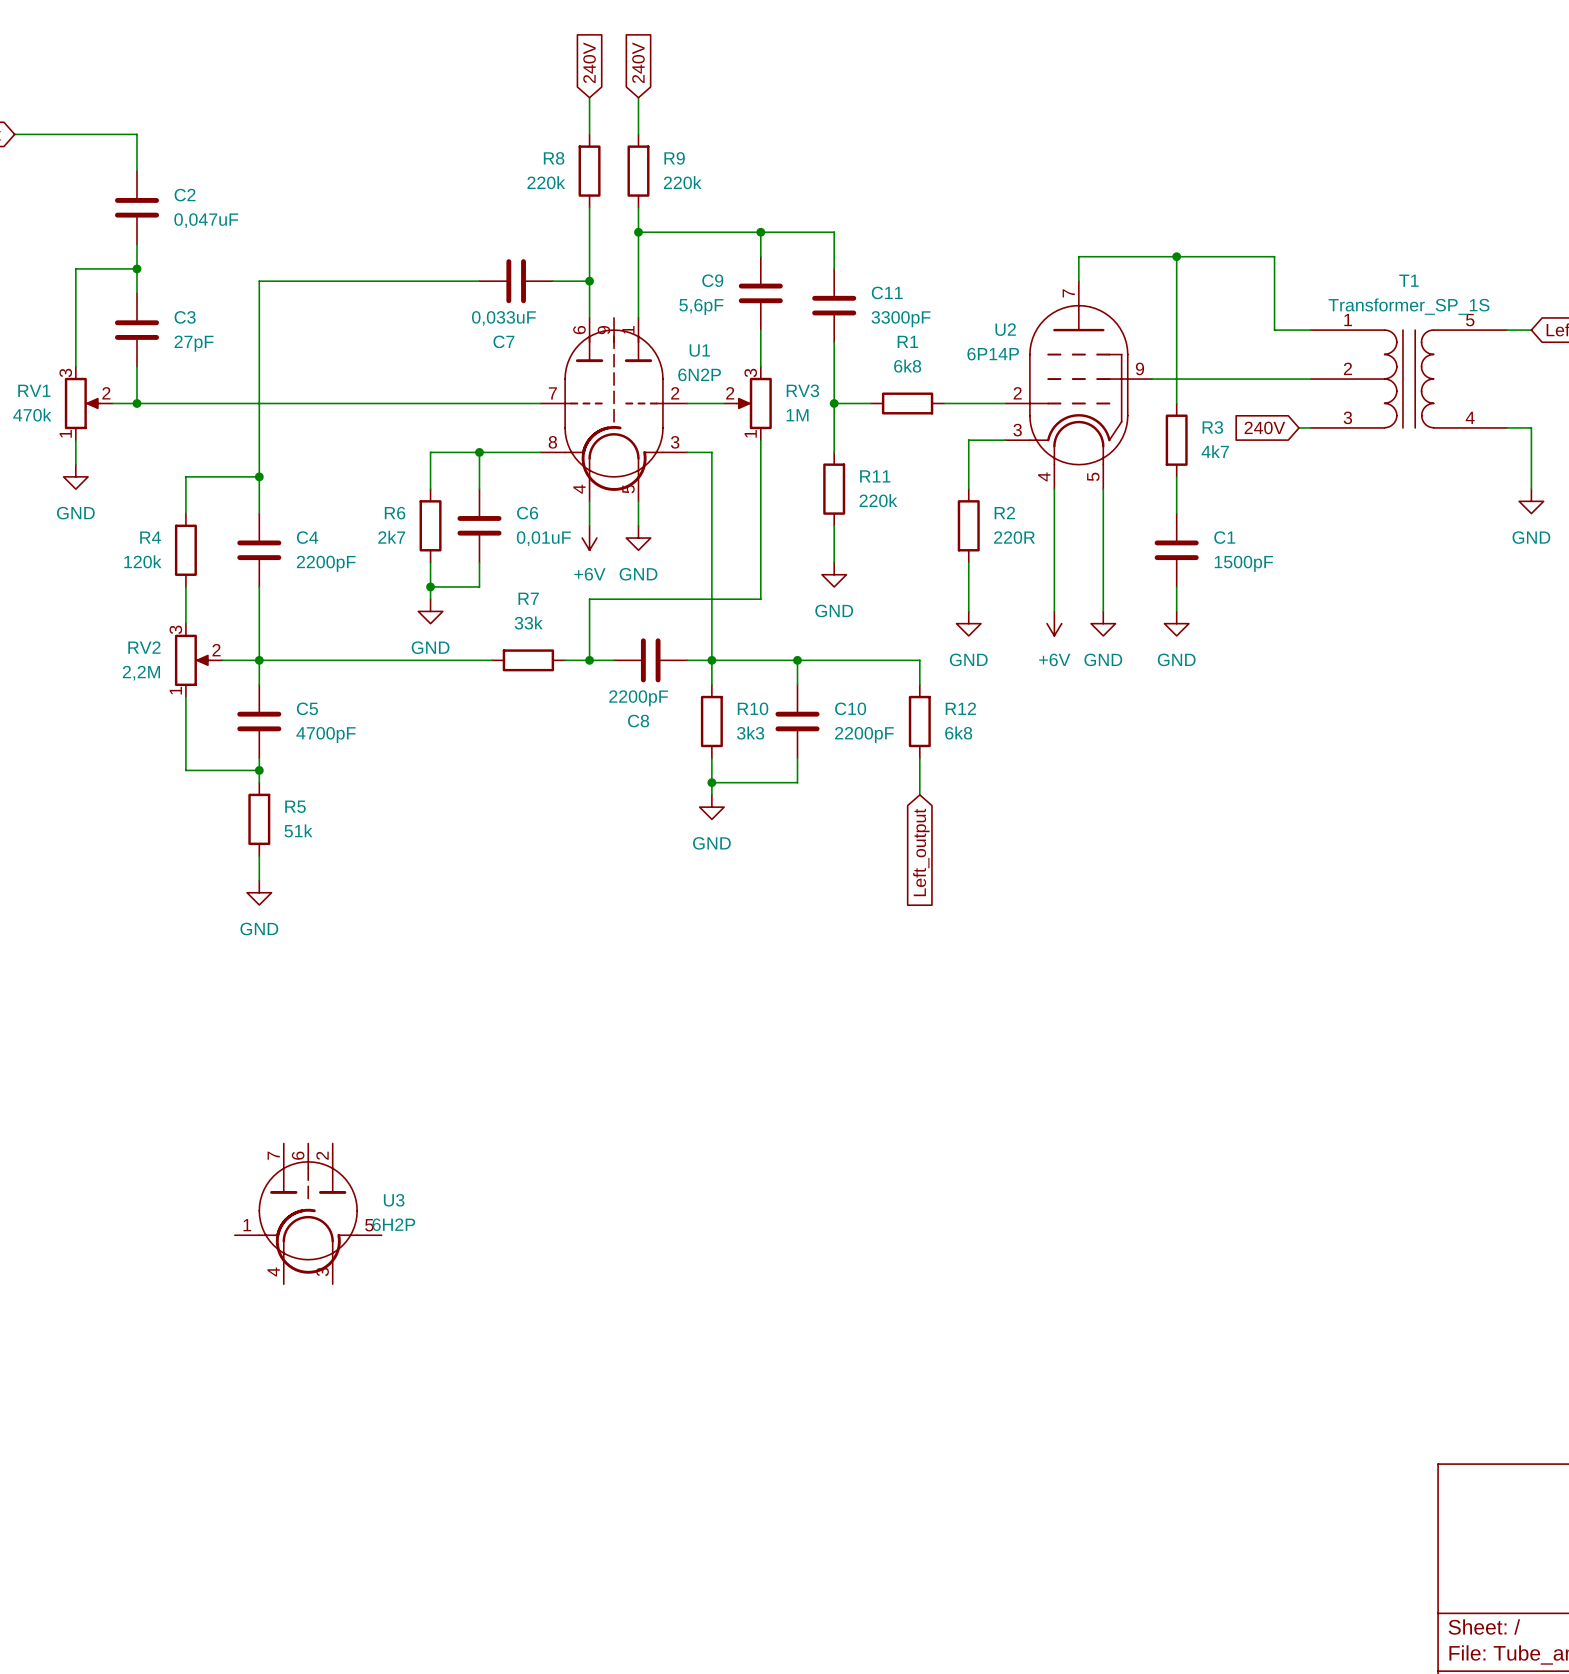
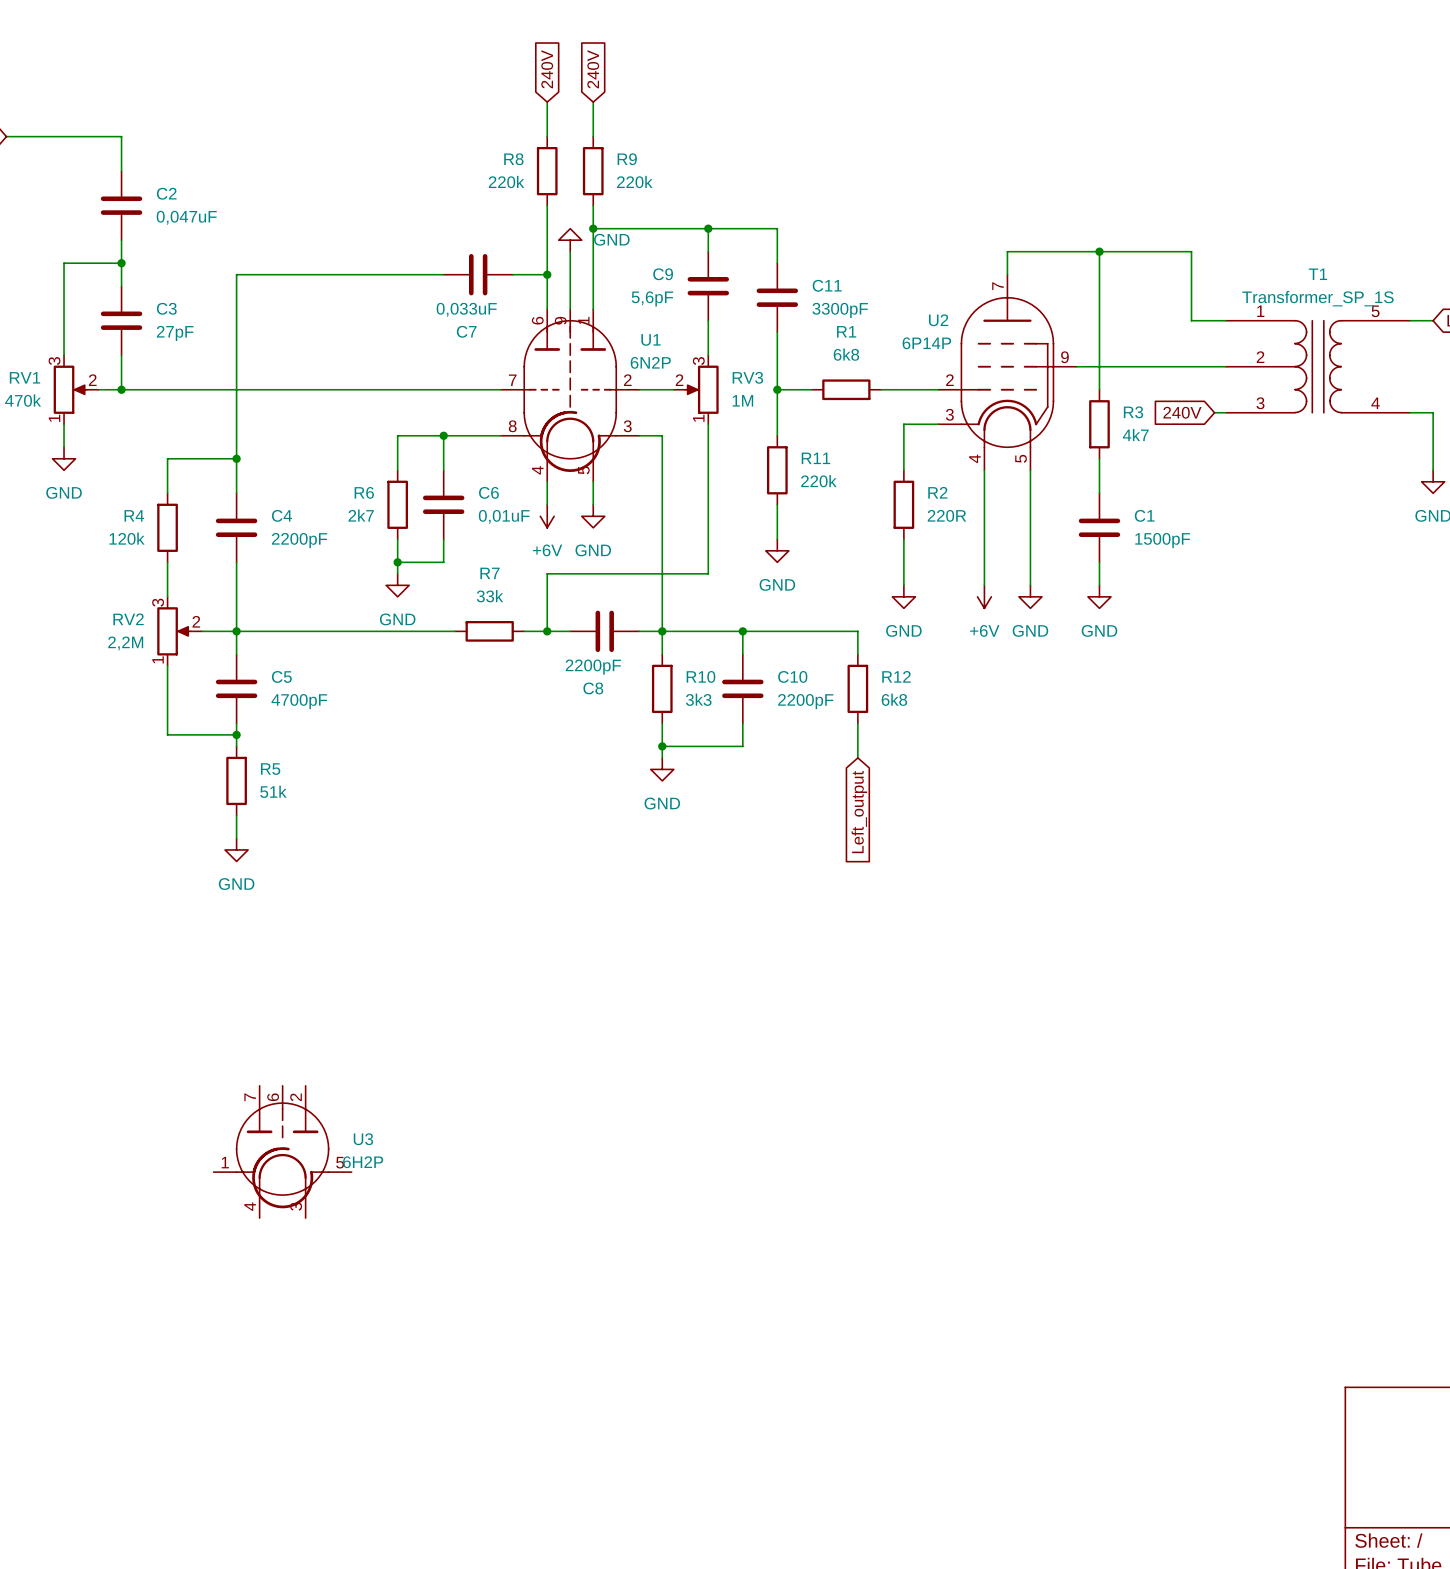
power symbol: none -> GND (570, 240)
wire: none -> (570, 251) (570, 309)

